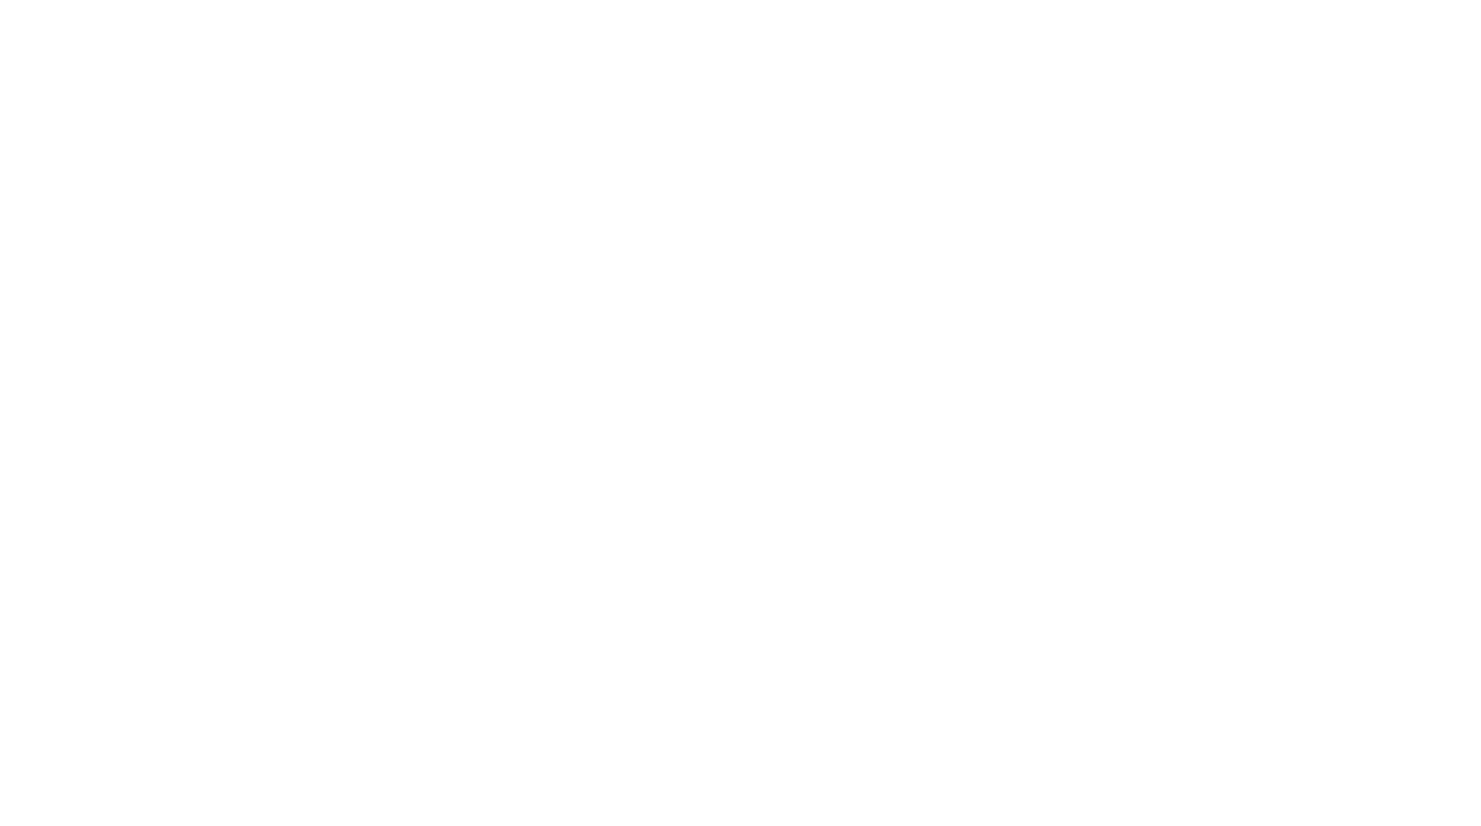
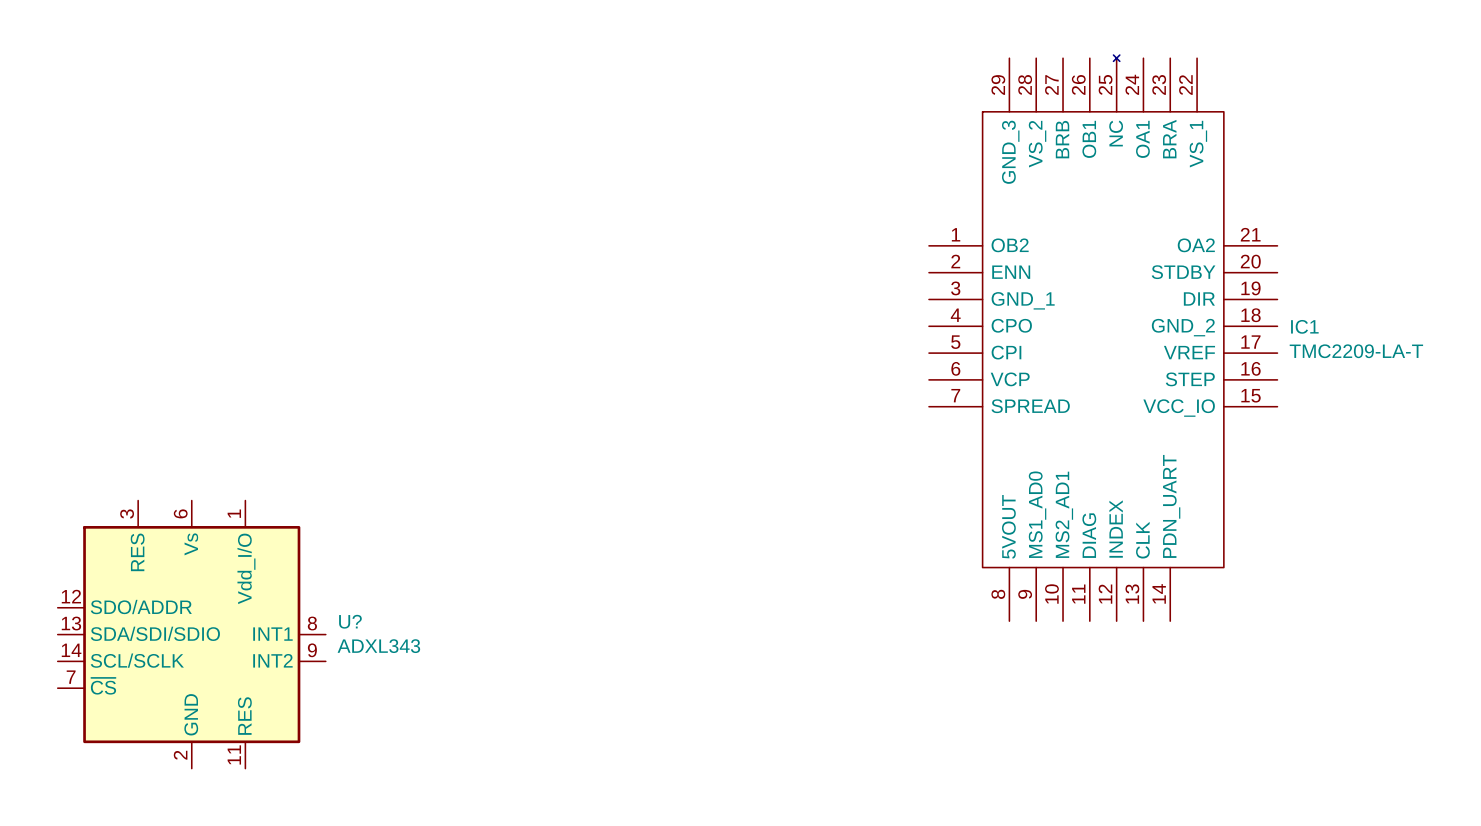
IC1: none -> TMC2209-LA-T (1103, 338)
U?: none -> ADXL343 (191, 634)

